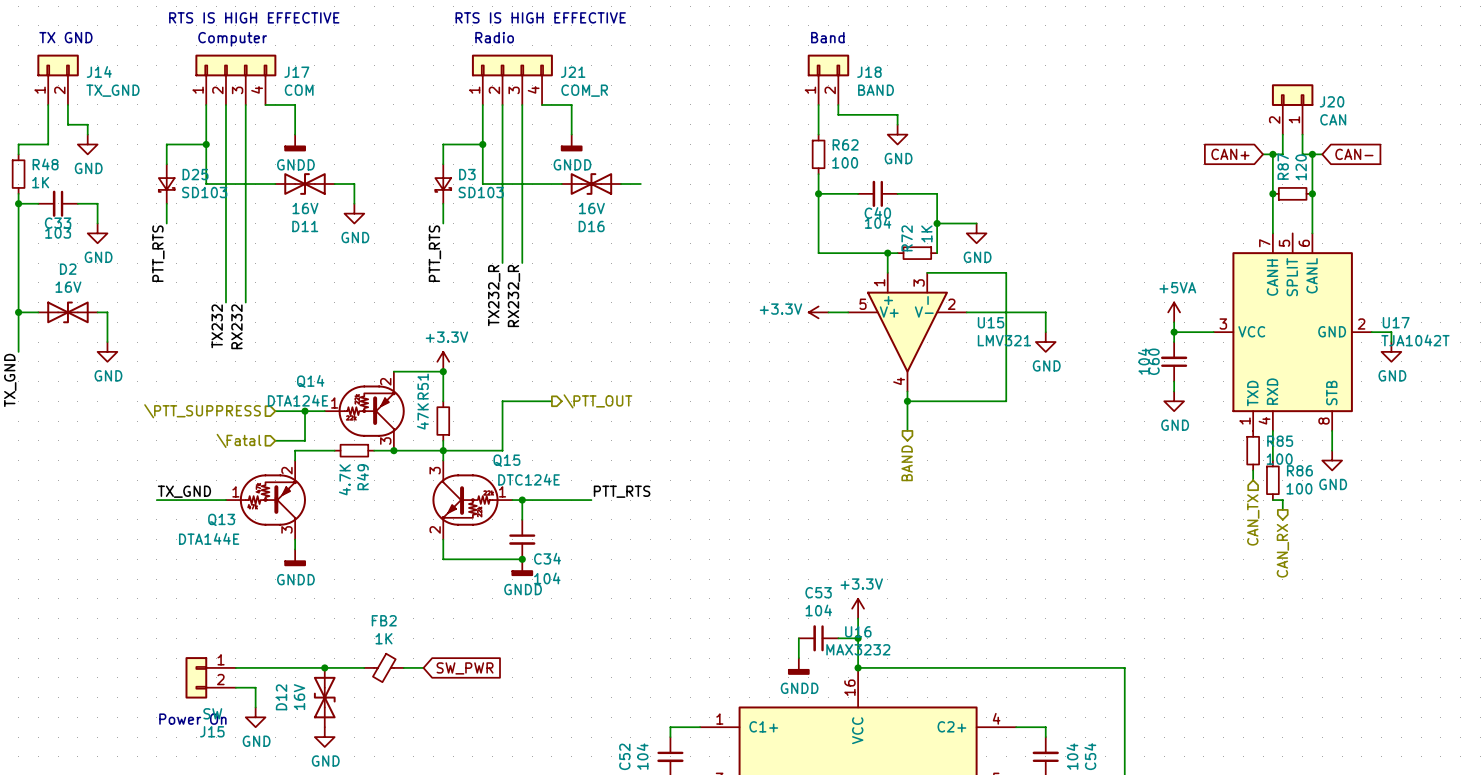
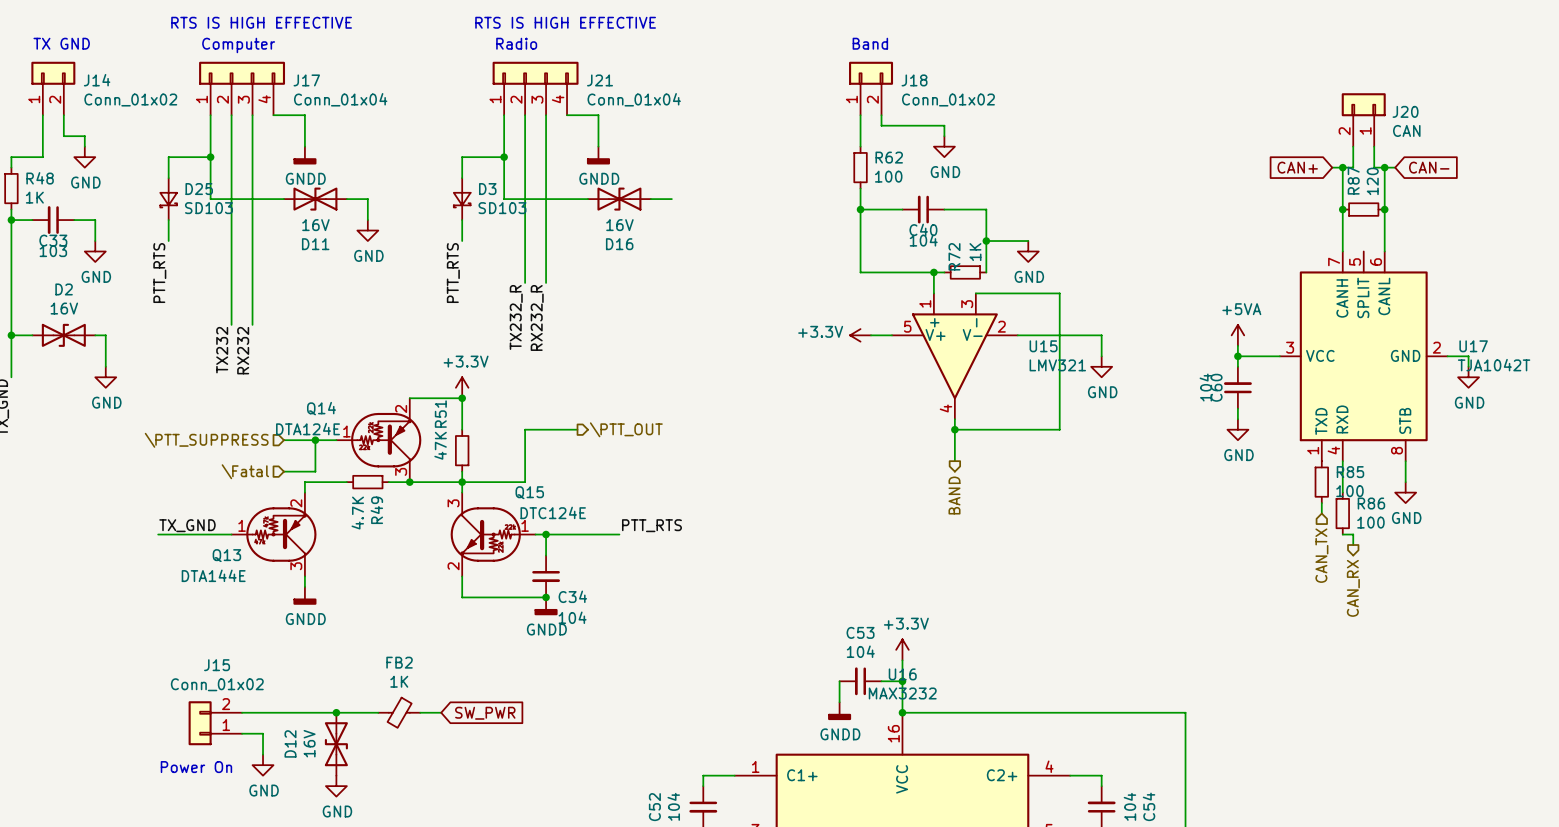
J14 value: TX_GND (112, 90) -> Conn_01x02 (130, 100)
J17 value: COM (299, 90) -> Conn_01x04 (340, 99)
J21 value: COM_R (584, 90) -> Conn_01x04 (634, 99)
J18 value: BAND (876, 90) -> Conn_01x02 (948, 100)
J15 flip: as is (196, 677) -> up-down (200, 723)
J15 value: SW (212, 713) -> Conn_01x02 (217, 684)

